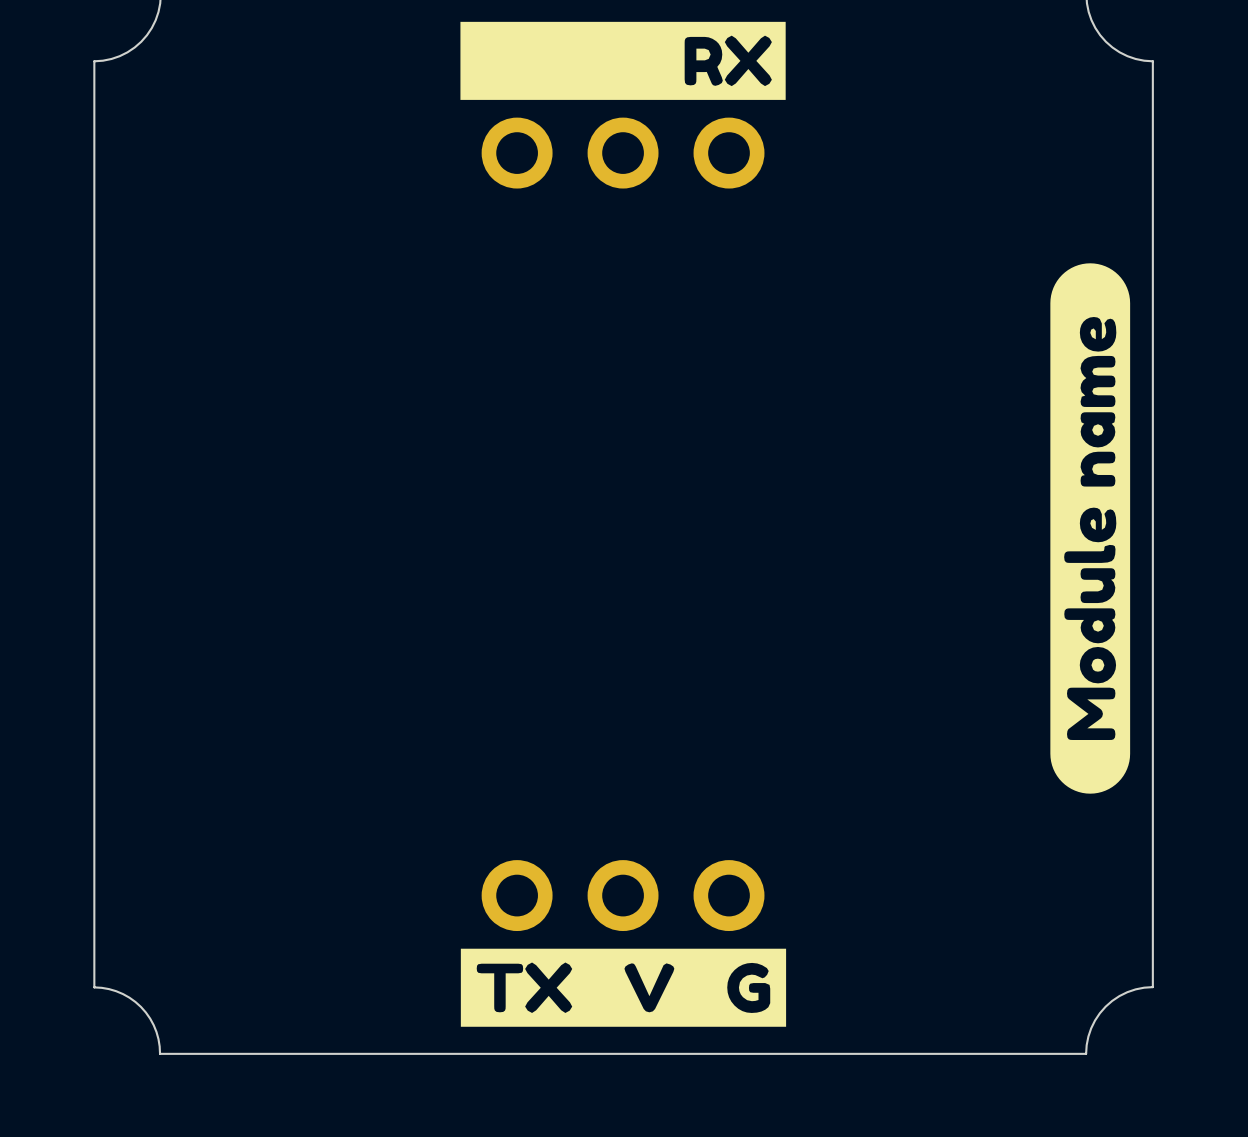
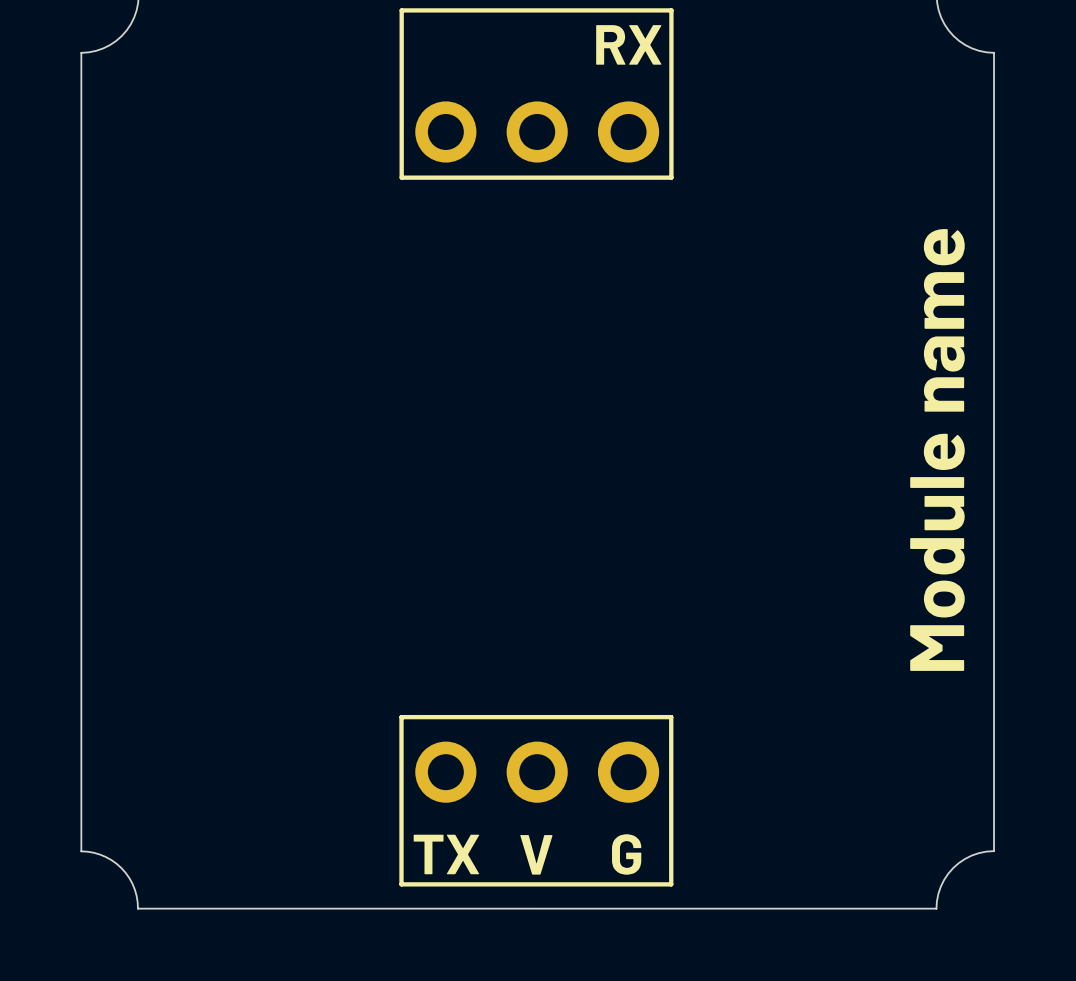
line: none -> (401, 10) (401, 177) (671, 177) (671, 10) (401, 10)
drawing: [460, 21, 786, 100] -> none
text: none -> RX (628, 44)
drawing: [1050, 263, 1131, 794] -> none
text: none -> Module name (937, 449)
line: none -> (401, 717) (401, 884) (671, 884) (671, 717) (401, 717)
drawing: [460, 948, 787, 1027] -> none
text: none -> TX (446, 854)
text: none -> V (536, 854)
text: none -> G (626, 854)

